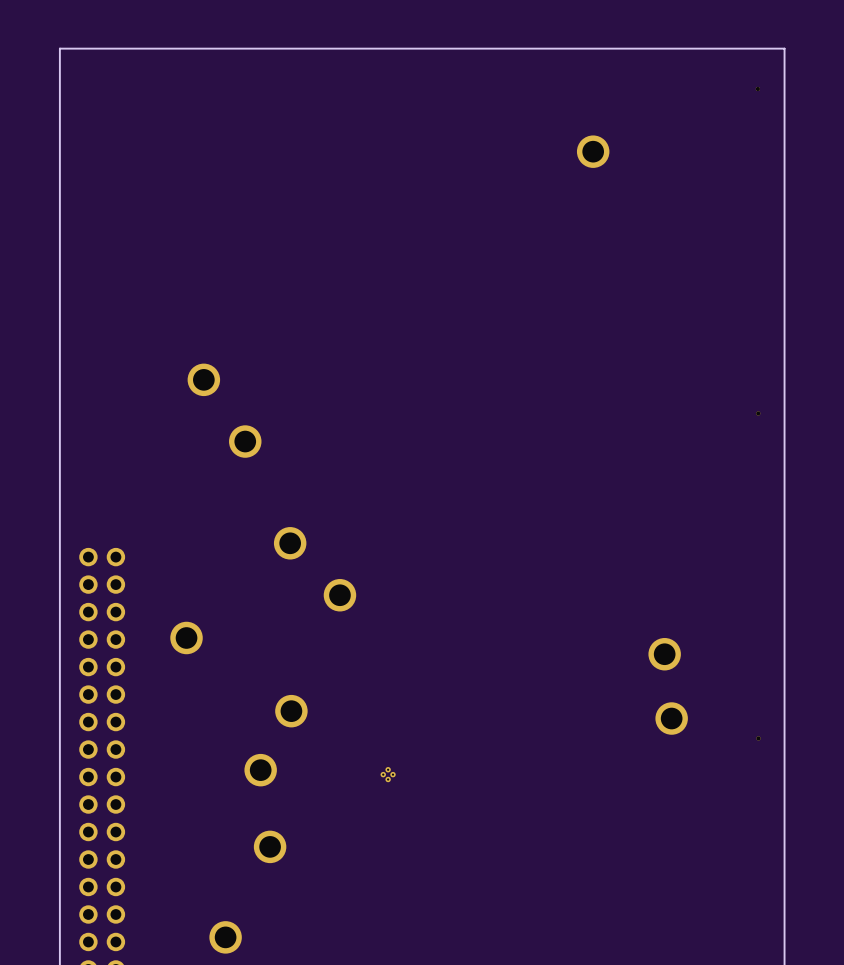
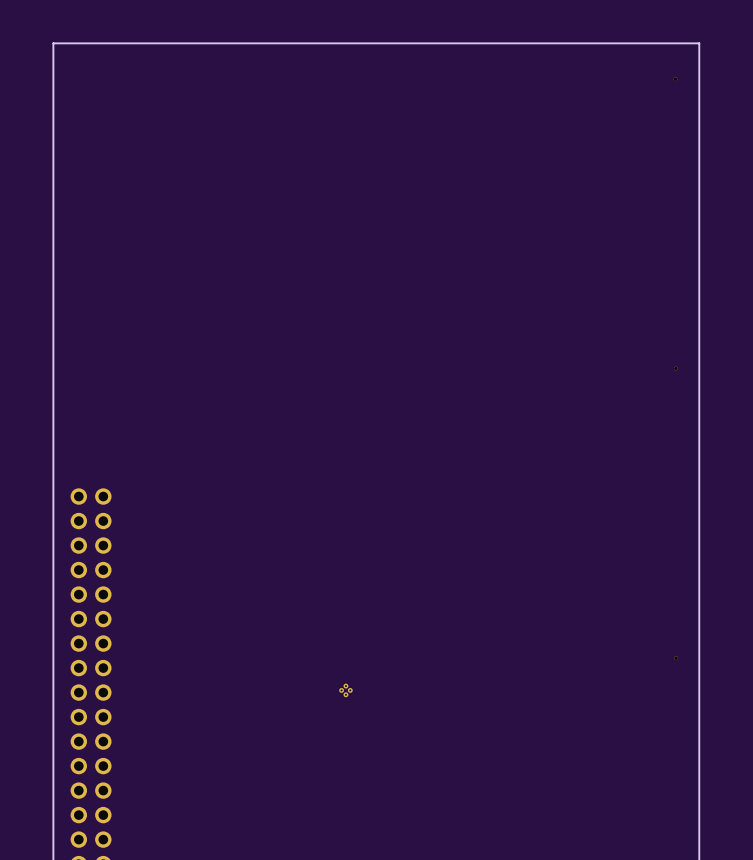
part: (593, 151) -> none
part: (203, 379) -> none
part: (245, 441) -> none
part: (290, 543) -> none
part: (339, 595) -> none
part: (186, 637) -> none
part: (664, 654) -> none
part: (291, 711) -> none
part: (671, 718) -> none
part: (260, 770) -> none
part: (270, 846) -> none
part: (225, 937) -> none

